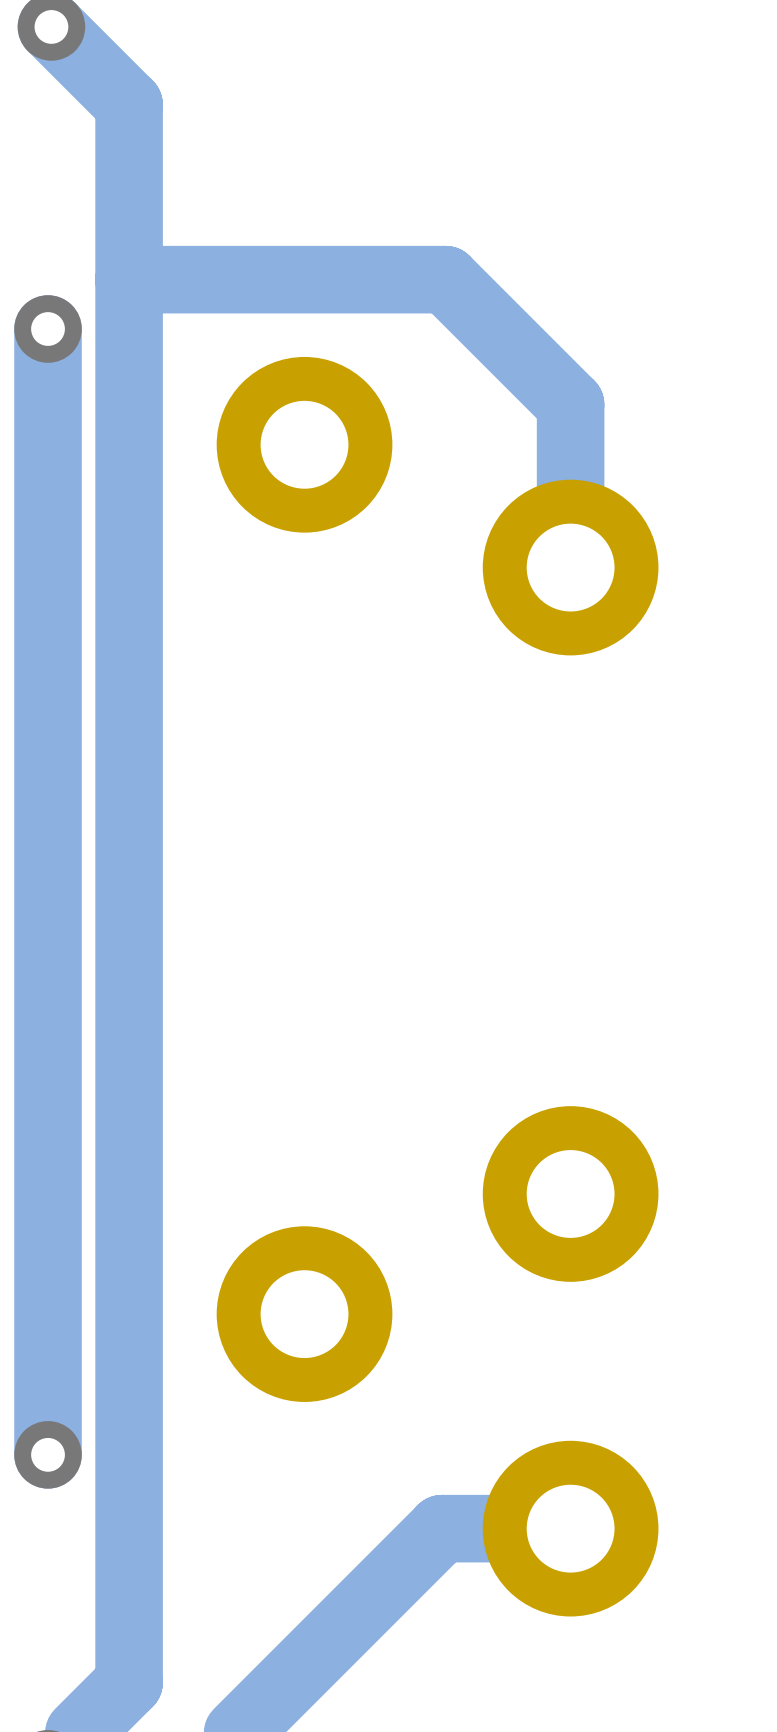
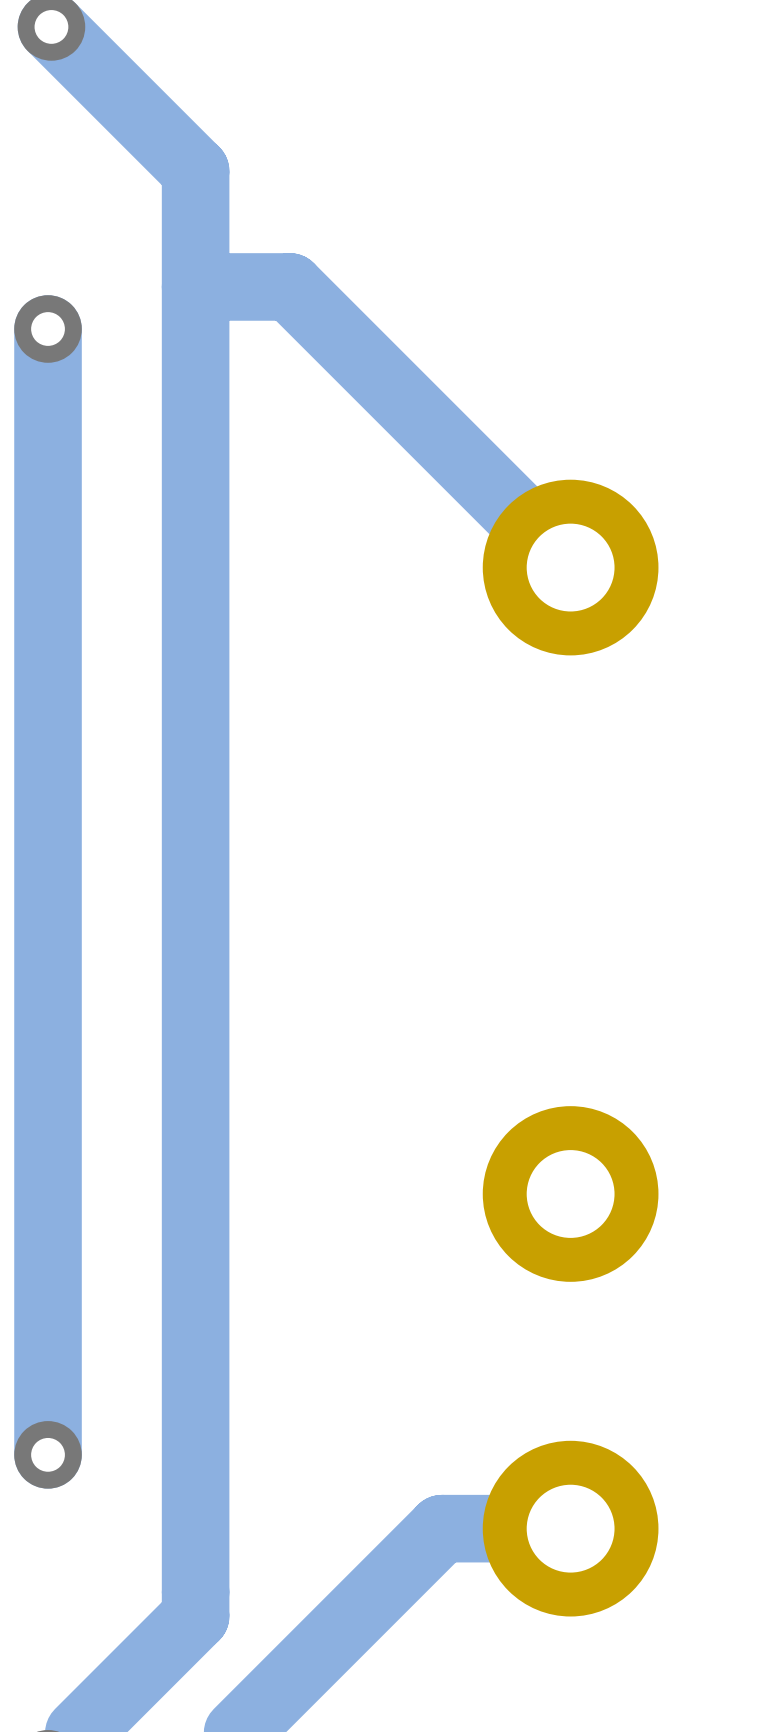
track: (129, 104) (129, 1682) -> (129, 104) (195, 171) (195, 1616) (129, 1682)
track: (129, 279) (445, 279) (570, 404) (570, 567) -> (195, 286) (290, 286) (570, 567)
part: (304, 444) -> none
part: (304, 1314) -> none

